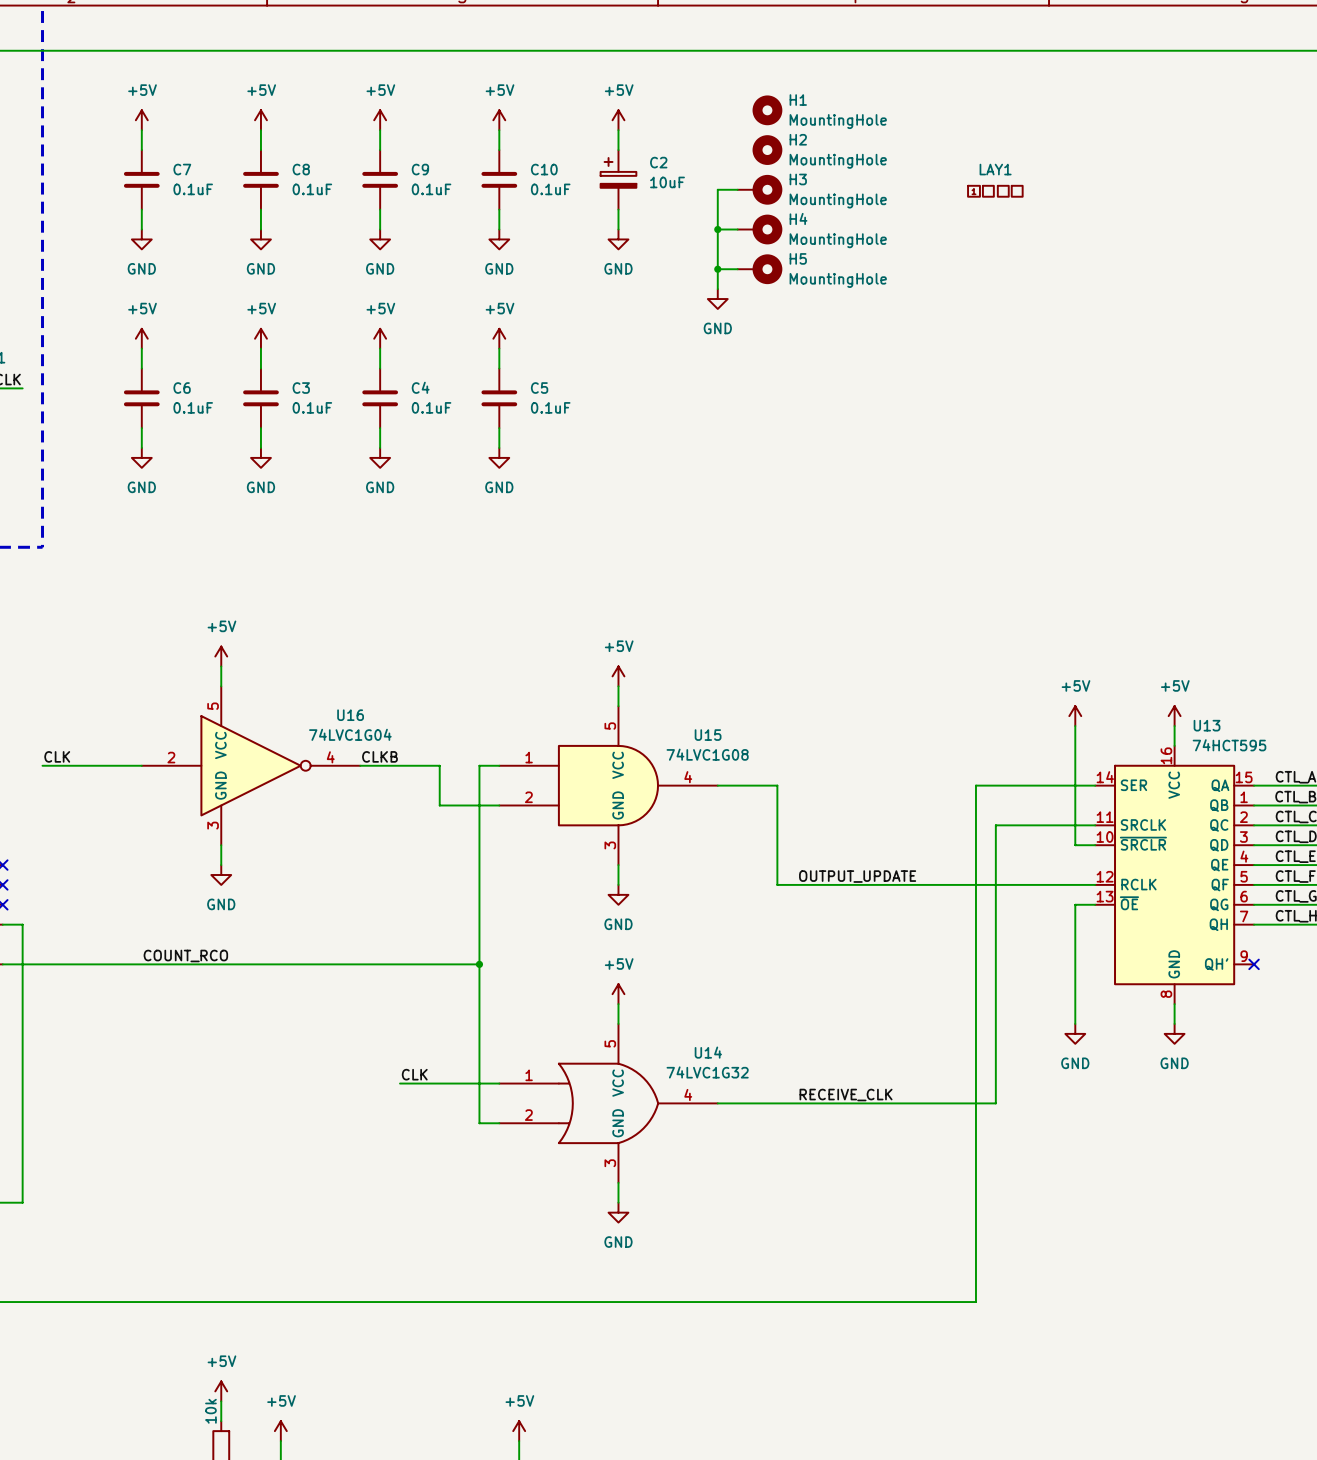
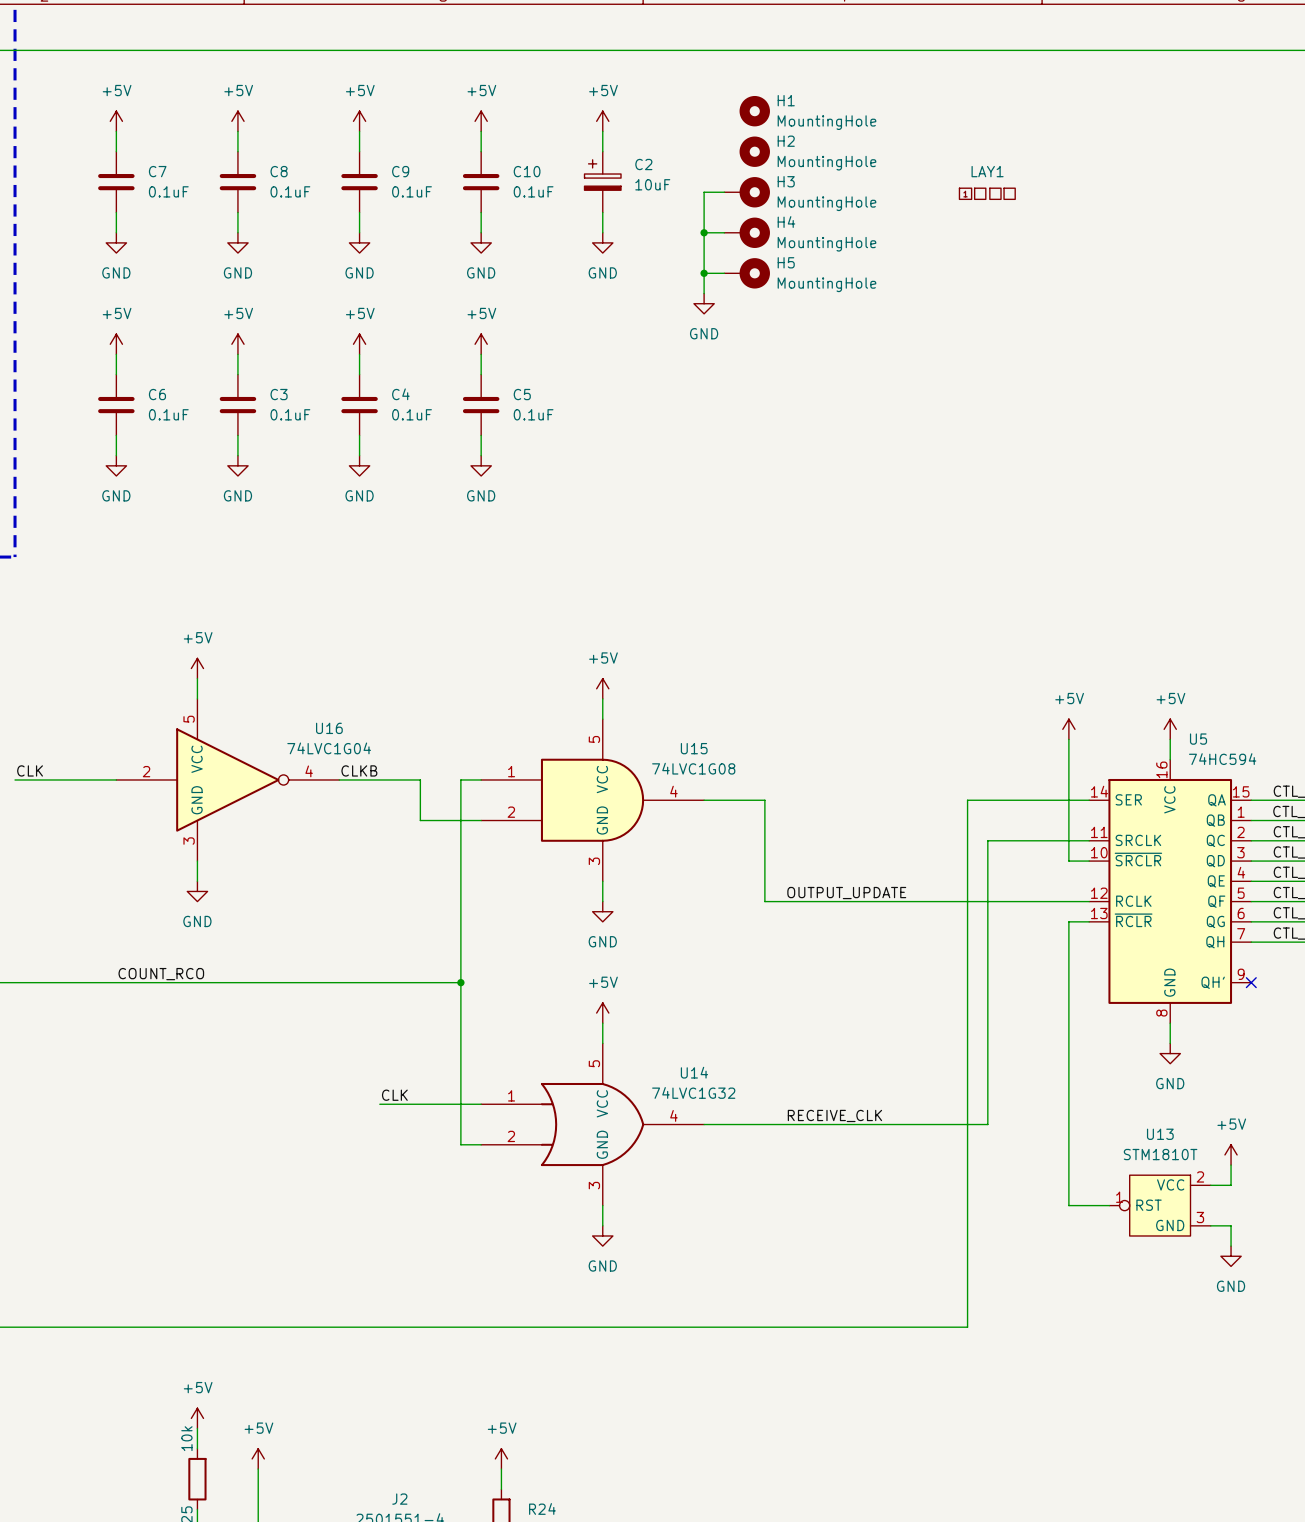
U13 name position: U13 (1207, 725) -> U13 (1160, 1134)
U13 symbol: [1095, 745, 1255, 1005] -> [1109, 1175, 1211, 1236]
U13 value: 74HCT595 (1229, 745) -> STM1810T (1160, 1154)
U5: none -> 74HC594 (1170, 891)
wire: none -> (1068, 1043) (1068, 1205) (1109, 1205)
power symbol: GND (1075, 1033) -> none
power symbol: none -> +5V (1231, 1154)
wire: none -> (1231, 1165) (1231, 1185) (1210, 1185)
wire: none -> (1210, 1225) (1231, 1225) (1231, 1246)
power symbol: none -> GND (1231, 1256)

